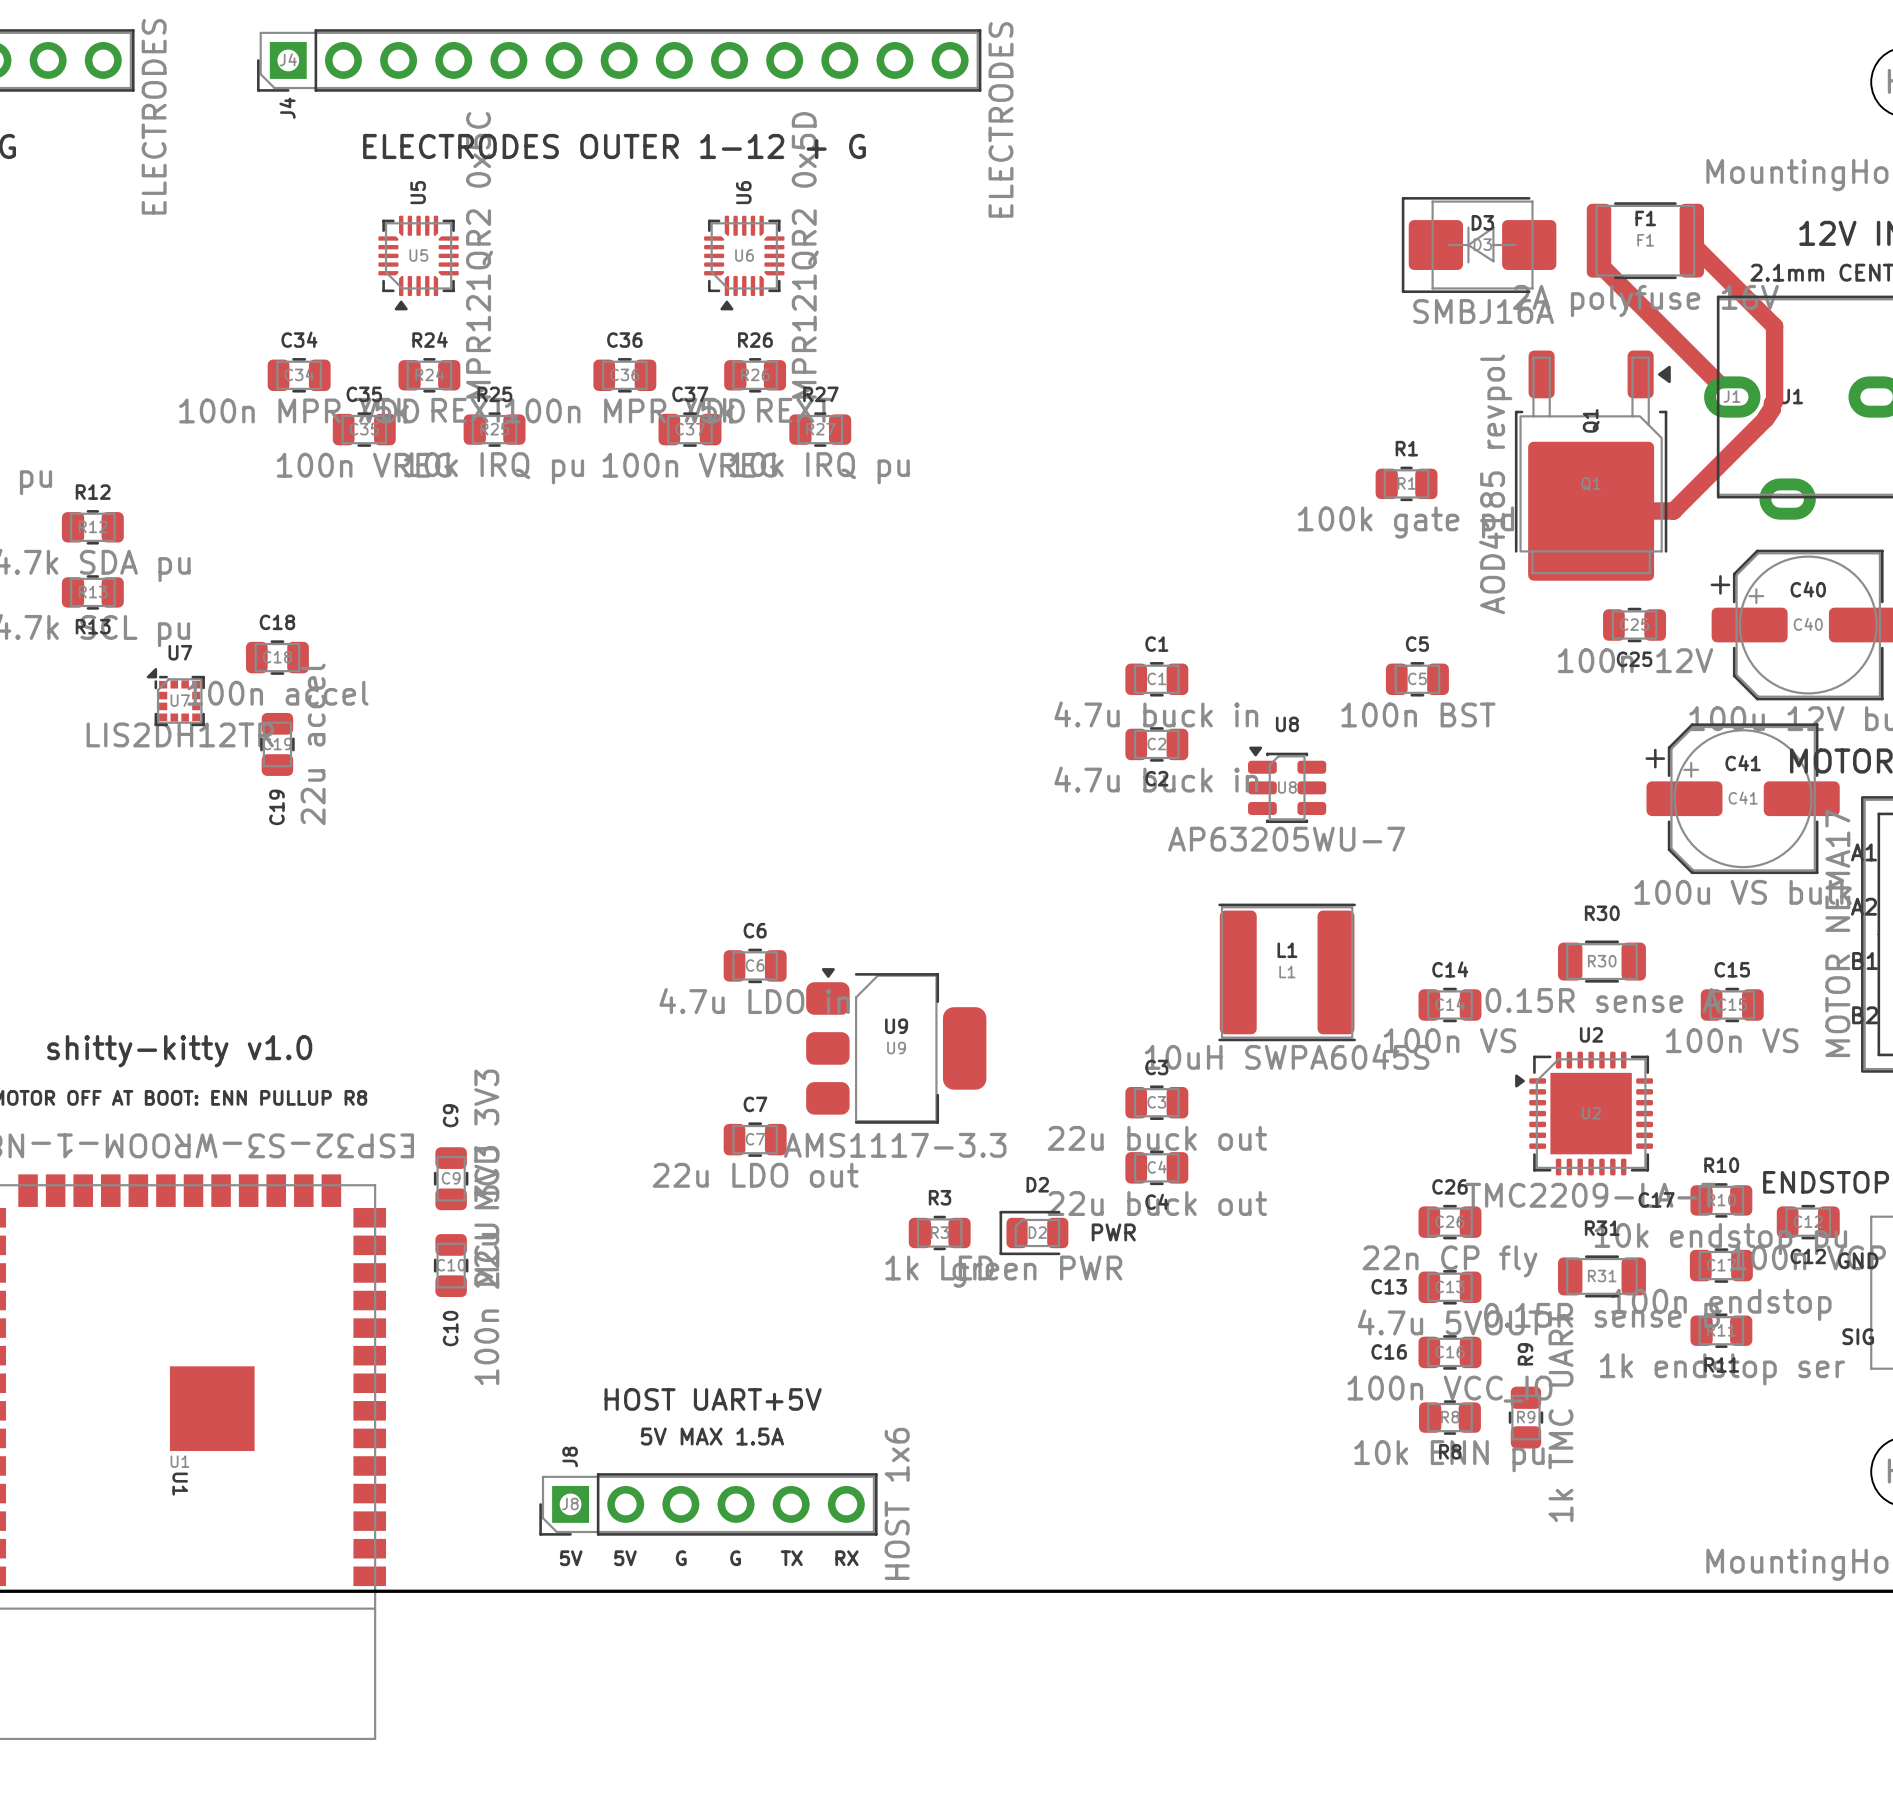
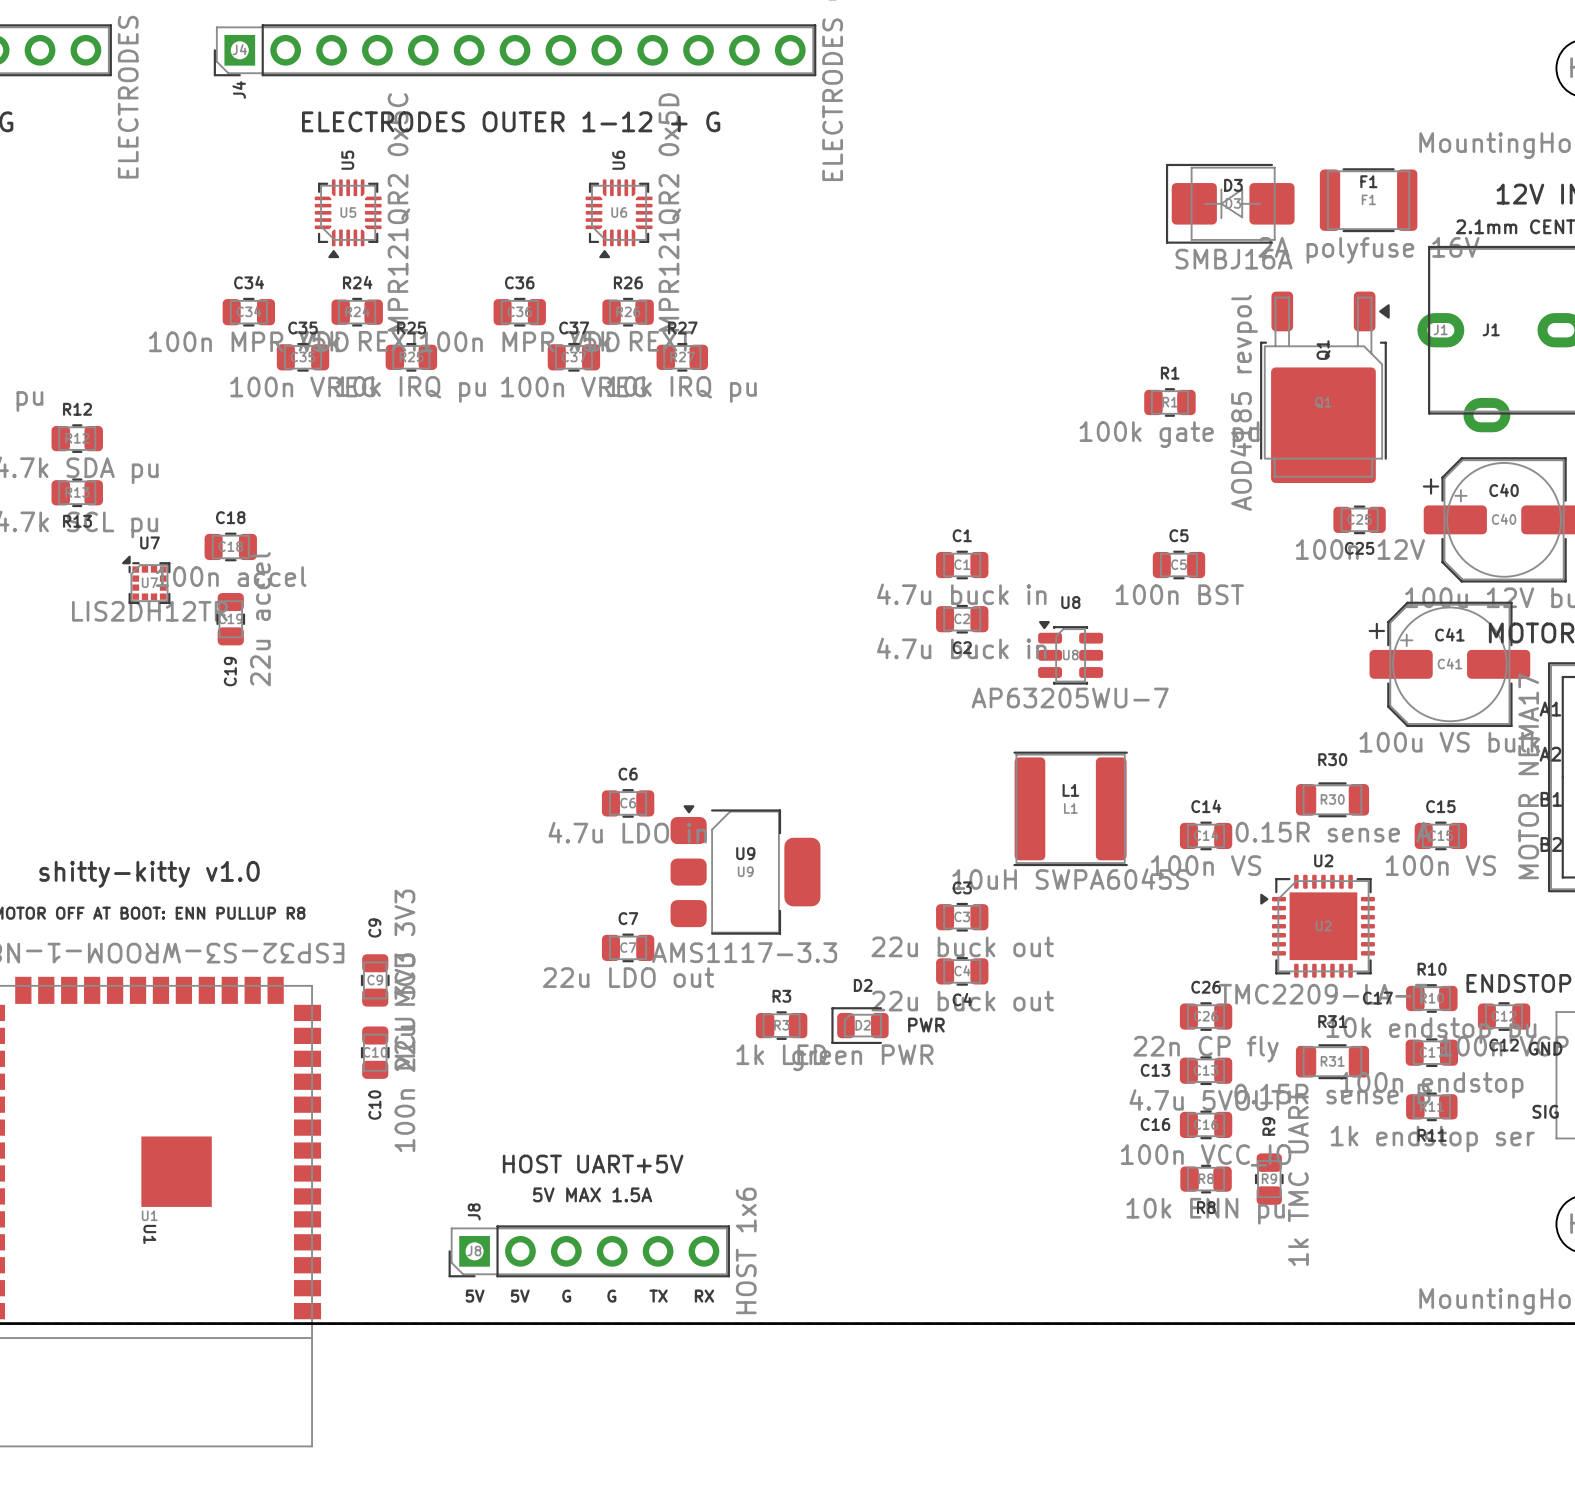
track: (1598, 240) (1598, 263) (1732, 397) -> none
track: (1692, 240) (1692, 243) (1774, 326) (1774, 401) (1772, 408) (1765, 418) (1673, 511) (1591, 511) -> none

